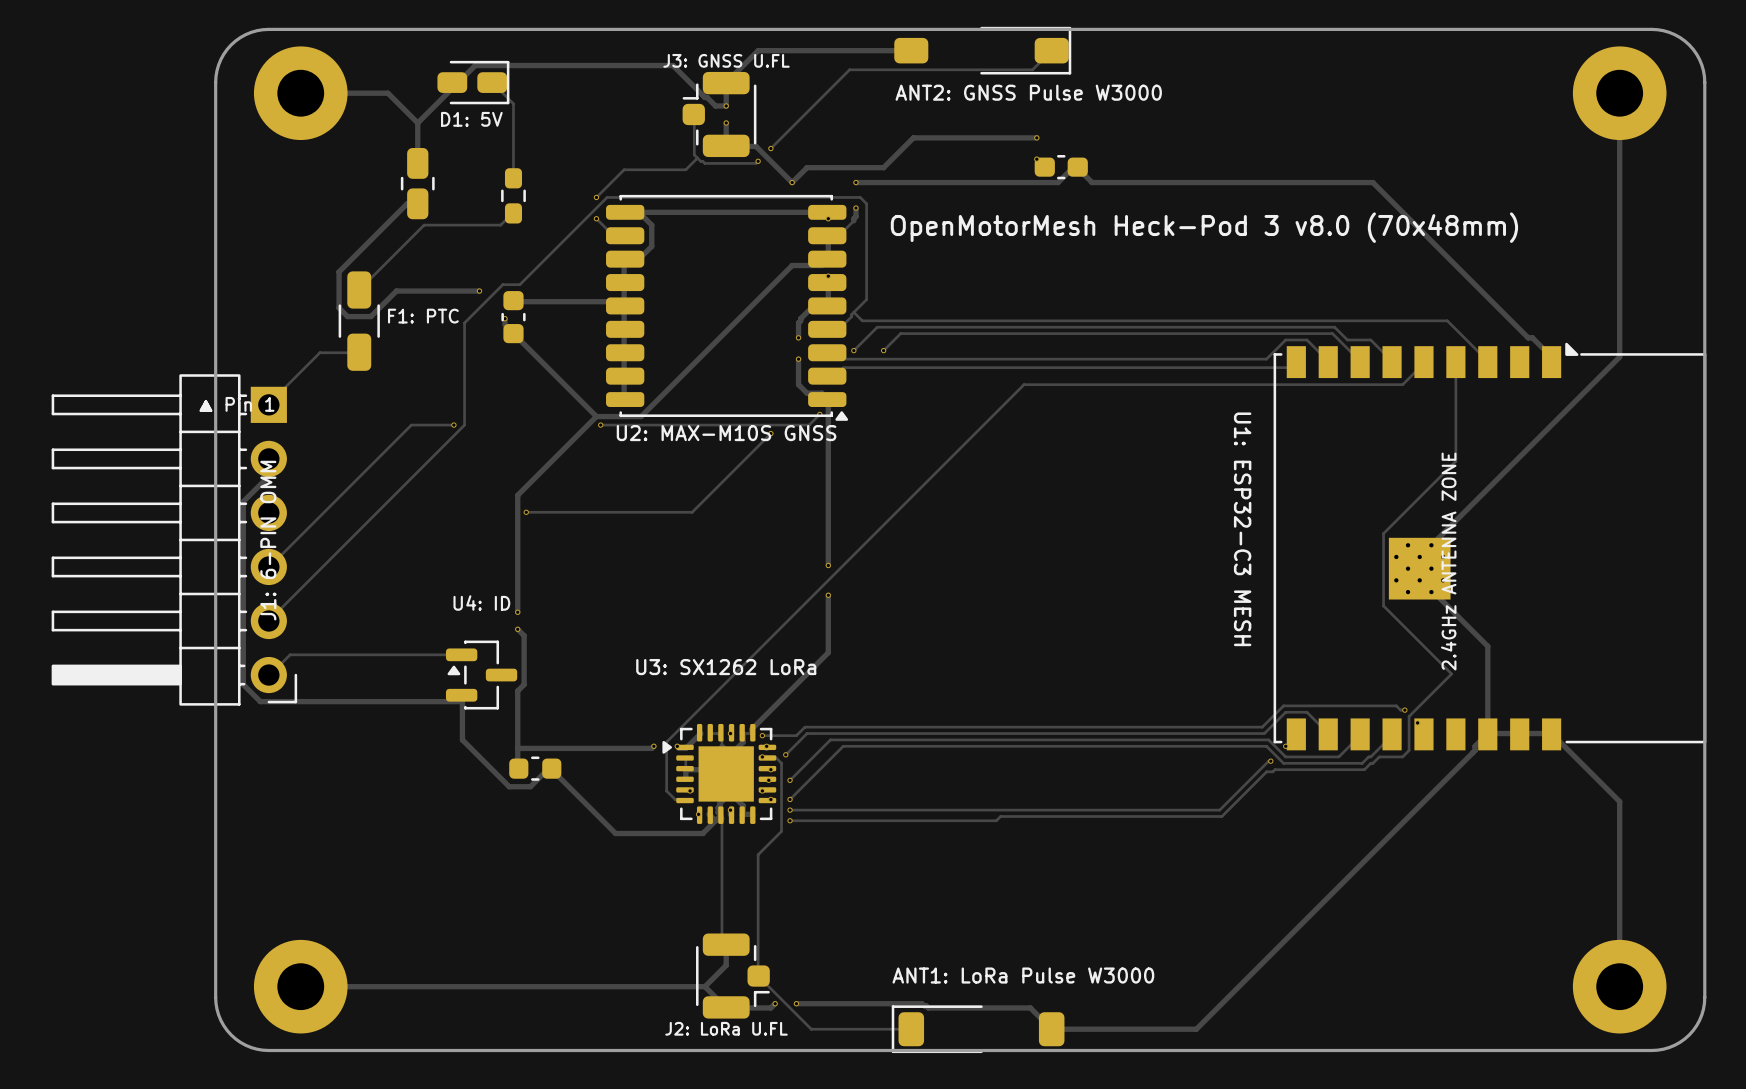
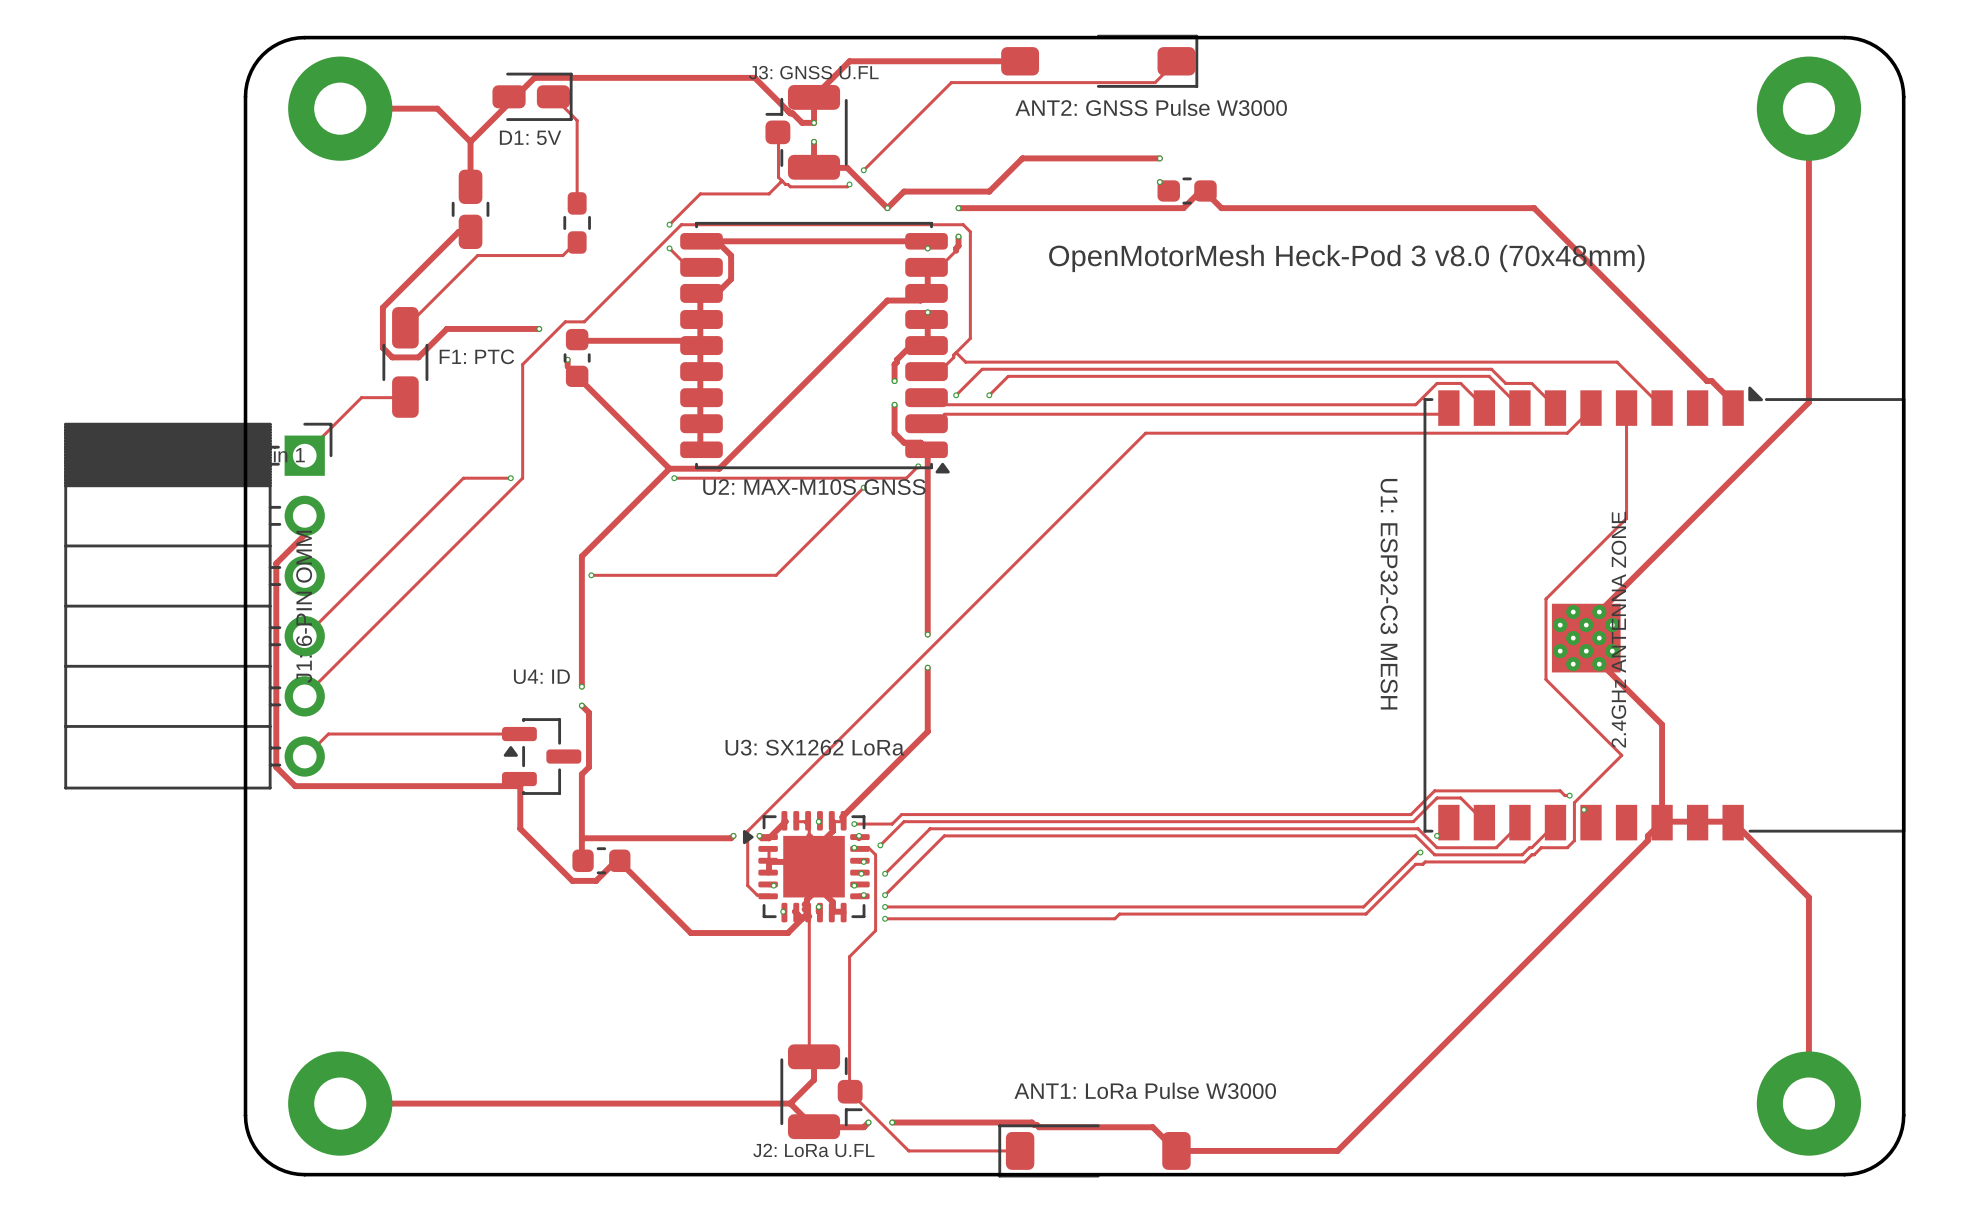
part footprint: [51, 374, 298, 706] -> [64, 422, 333, 790]

